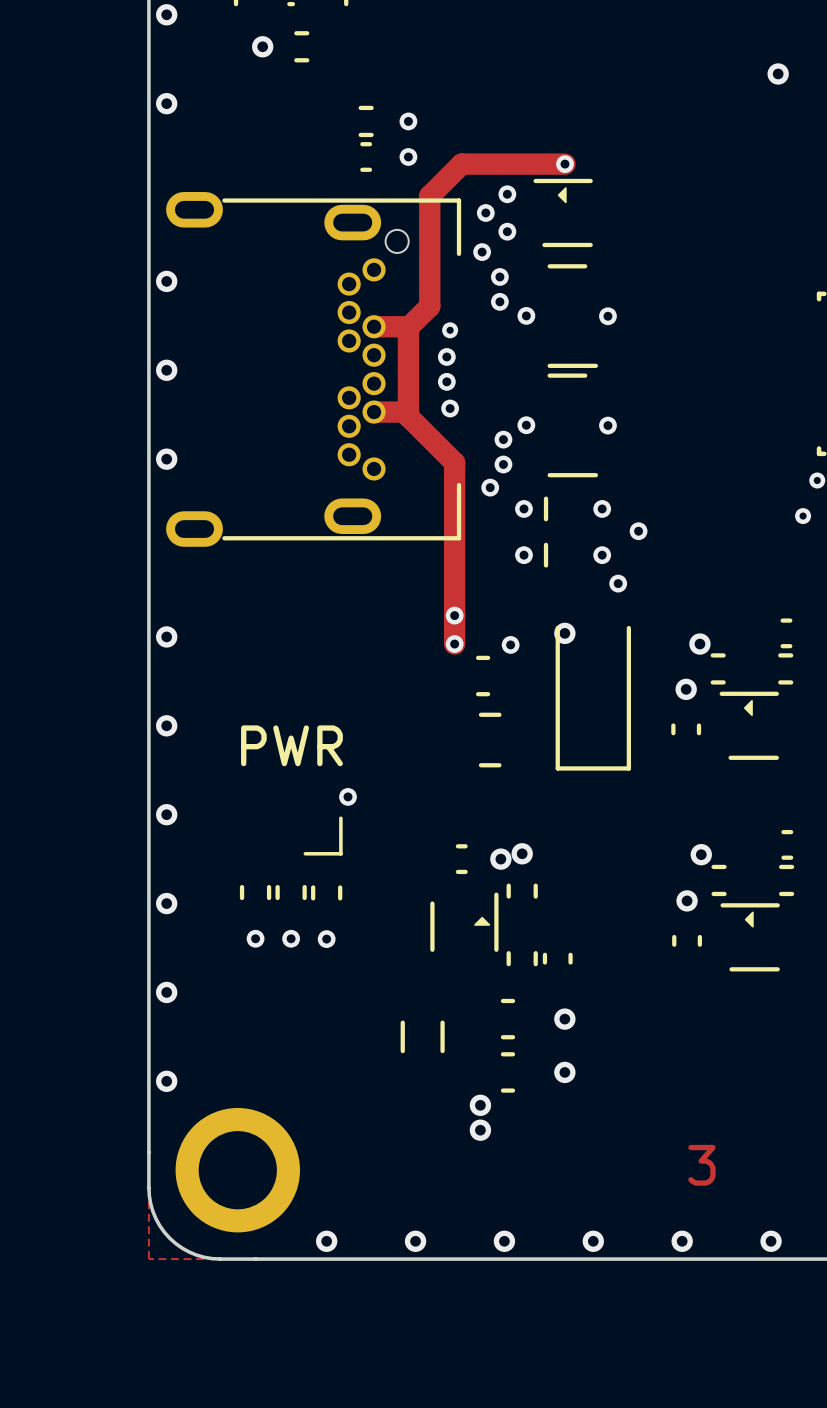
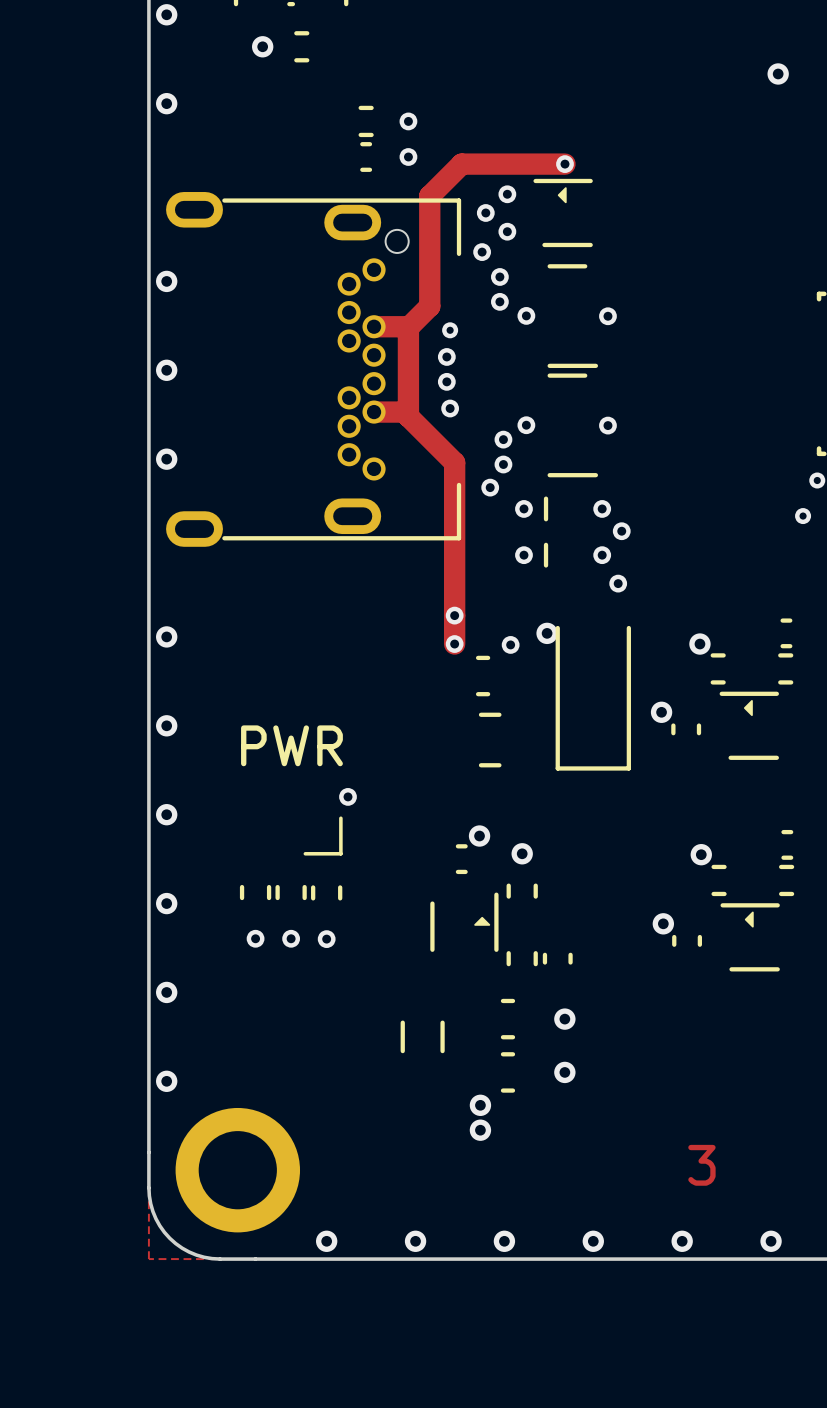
via position: (638, 531) -> (621, 531)
via position: (564, 633) -> (547, 633)
via position: (686, 689) -> (661, 712)
via position: (500, 859) -> (479, 836)
via position: (687, 900) -> (663, 923)

